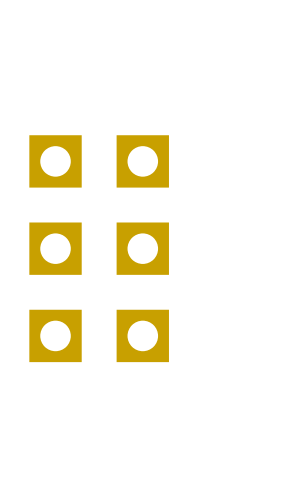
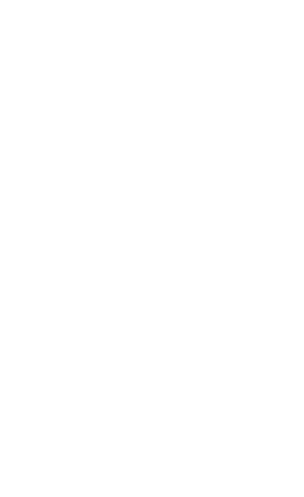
part: (99, 248) -> none

